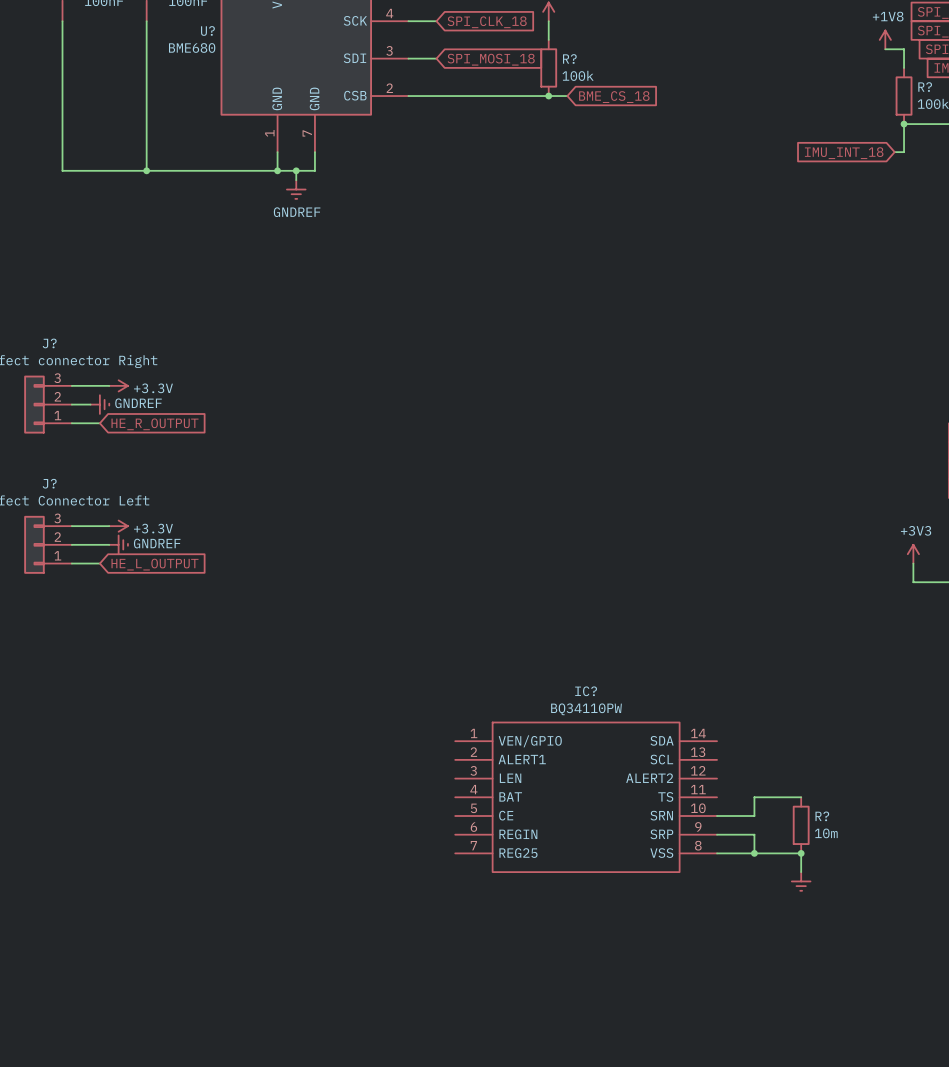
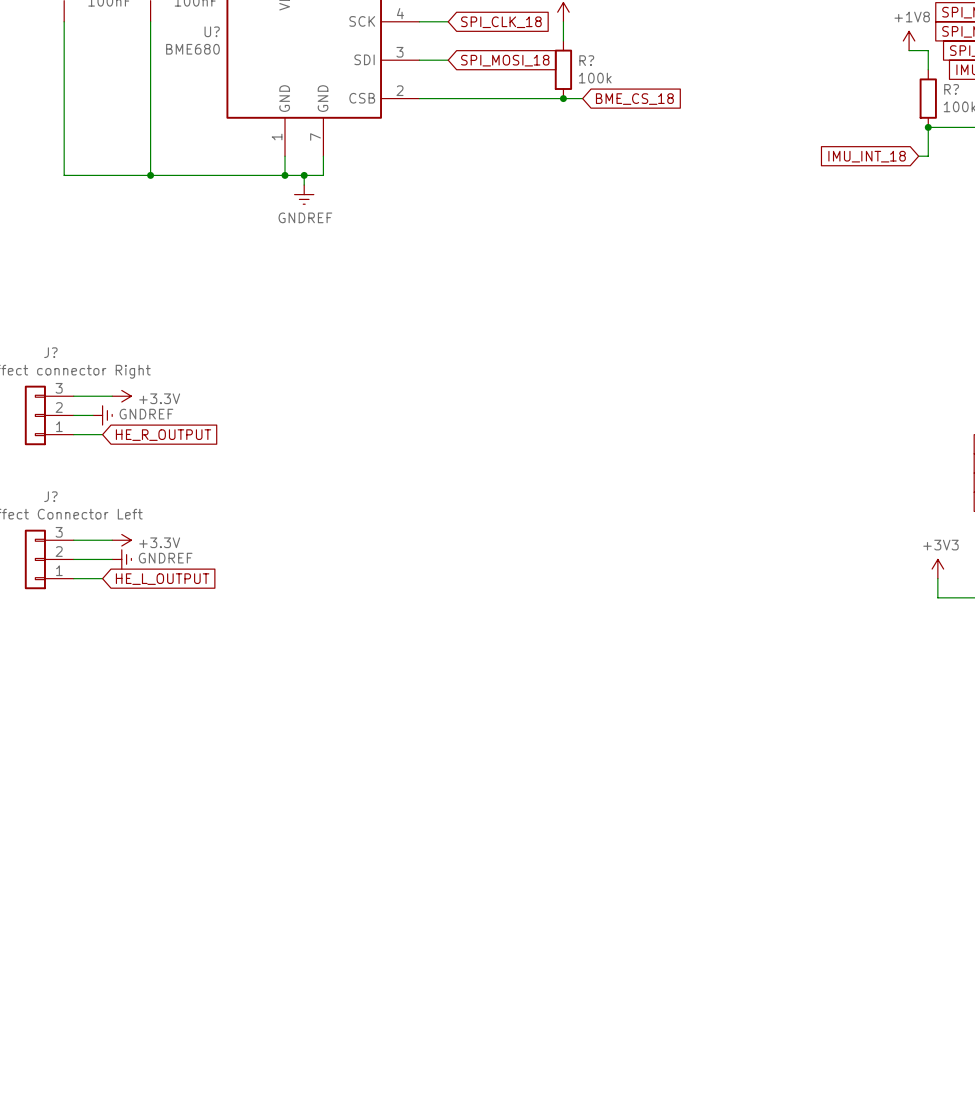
IC?: BQ34110PW (586, 797) -> none
wire: (801, 797) (754, 797) (754, 815) (717, 815) -> none
R?: 10m (801, 825) -> none
wire: (717, 834) (754, 834) (754, 853) -> none
wire: (717, 853) (801, 853) (801, 872) -> none
junction: (754, 853) -> none
junction: (801, 853) -> none
power symbol: (801, 881) -> none

